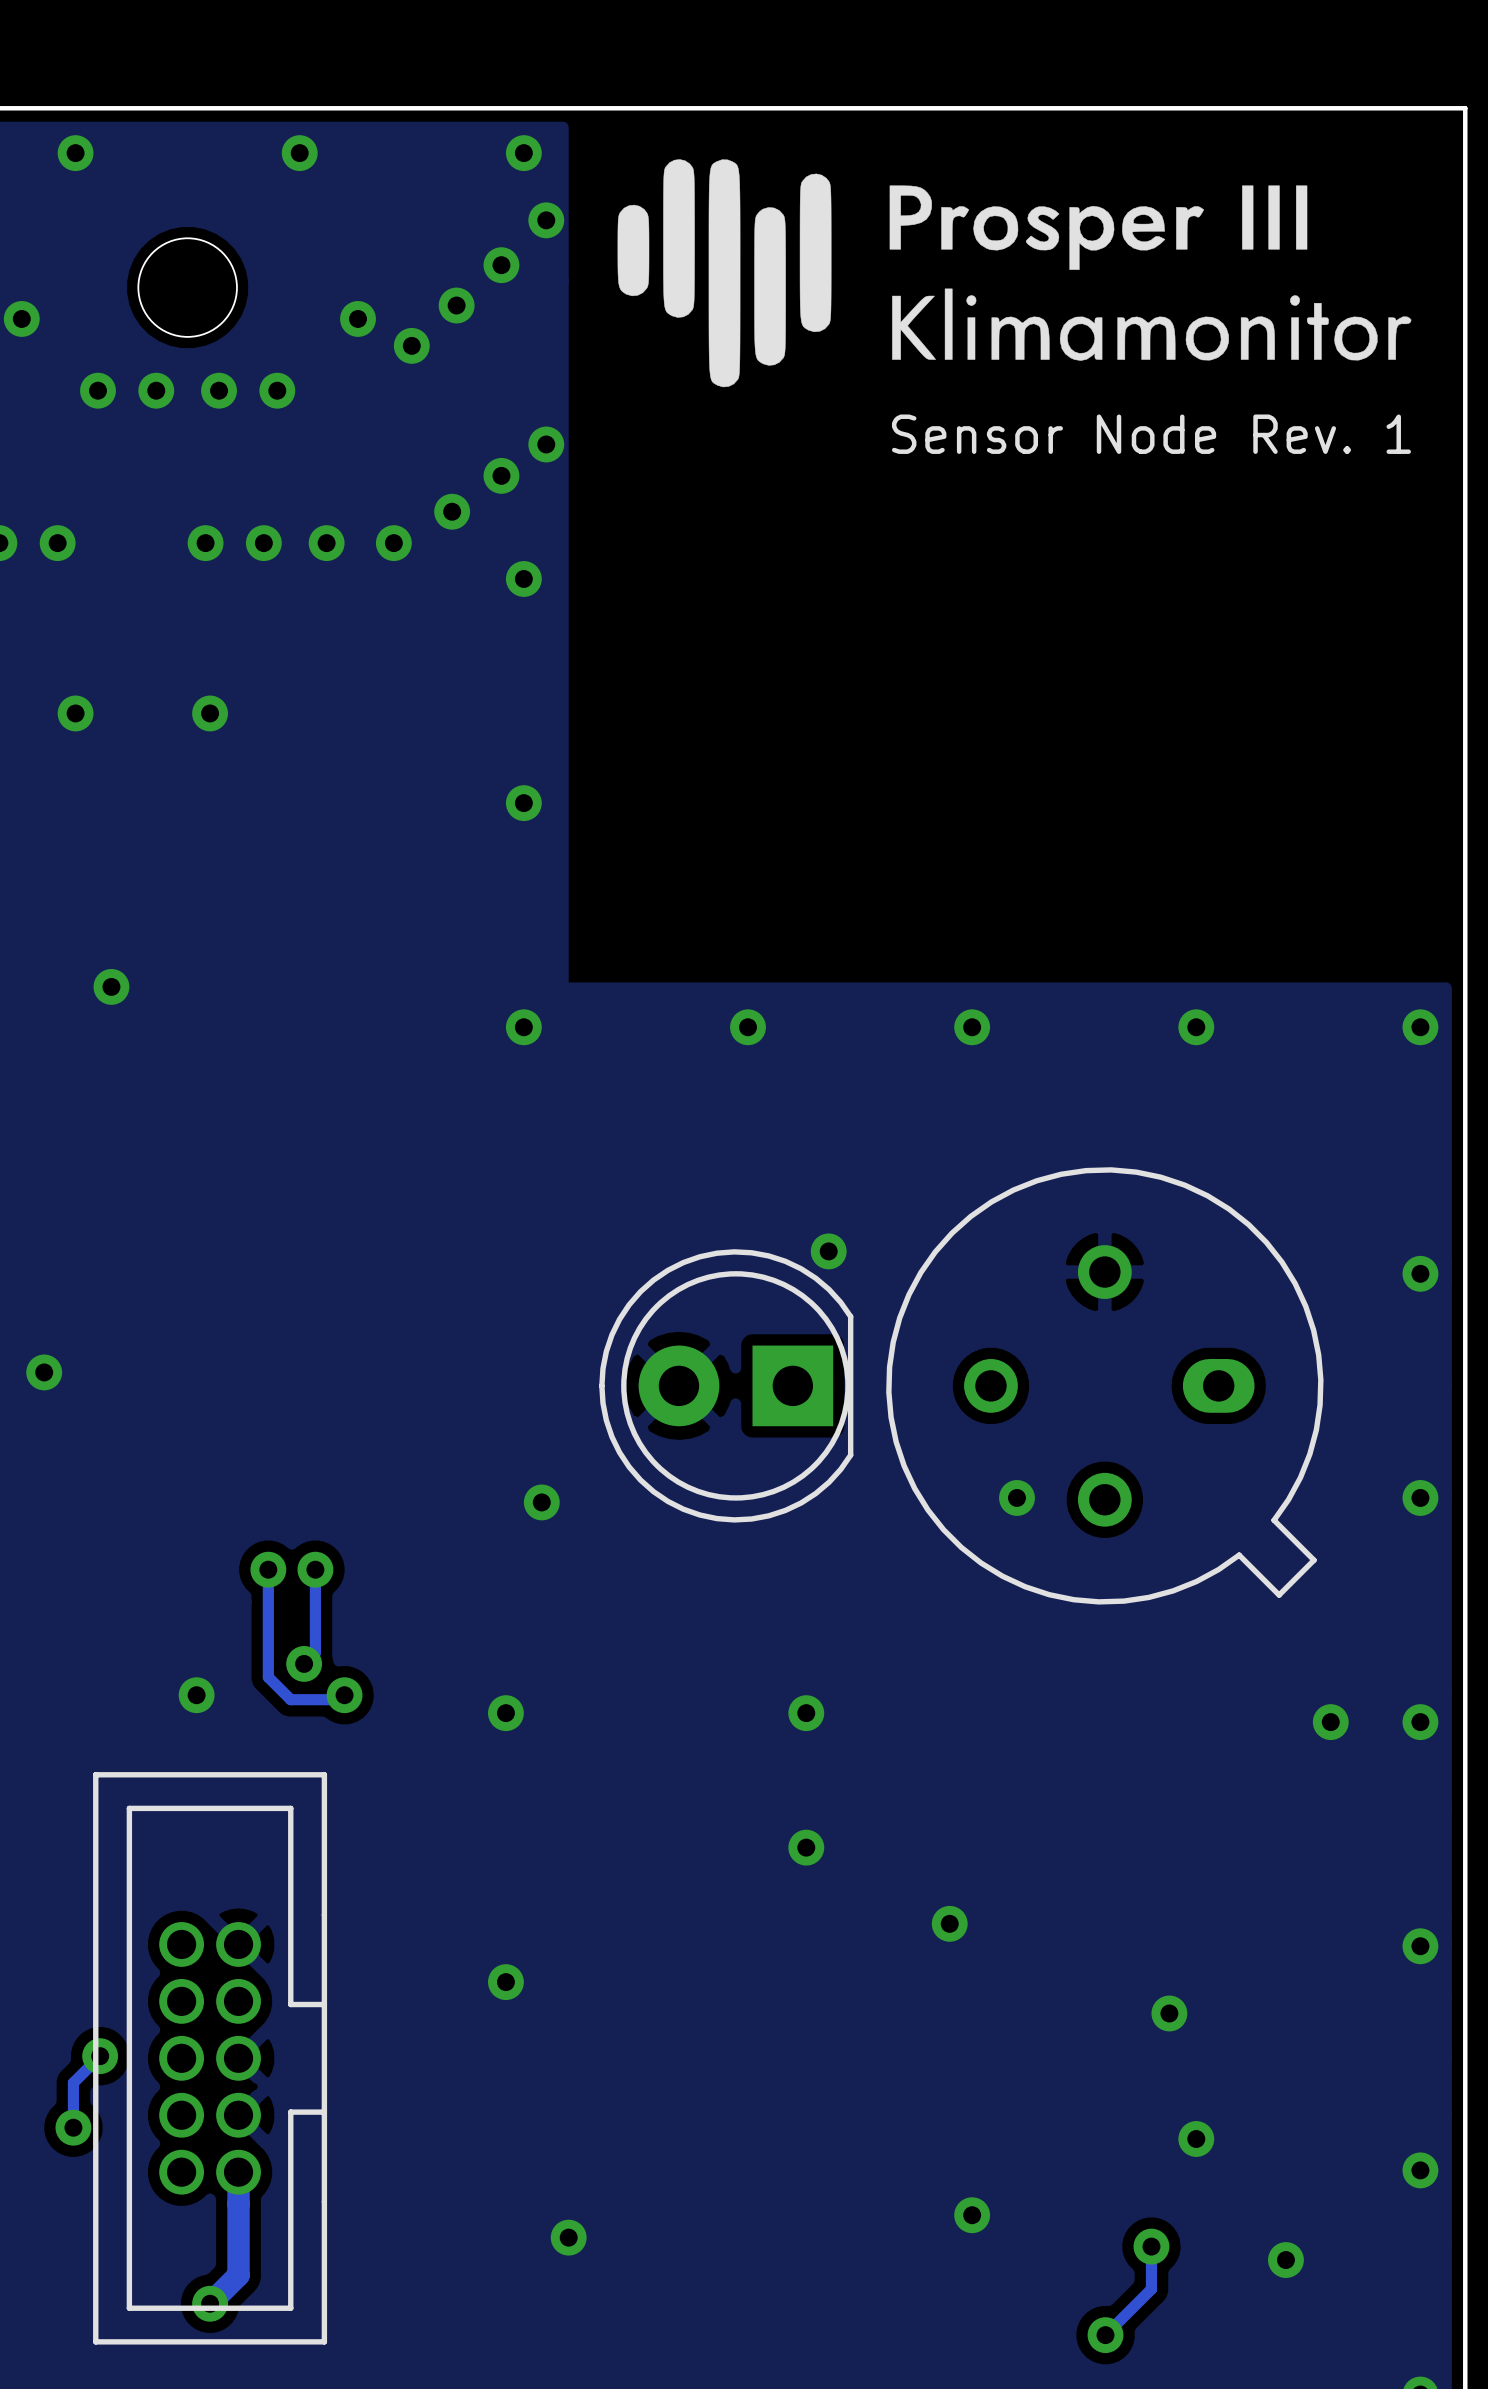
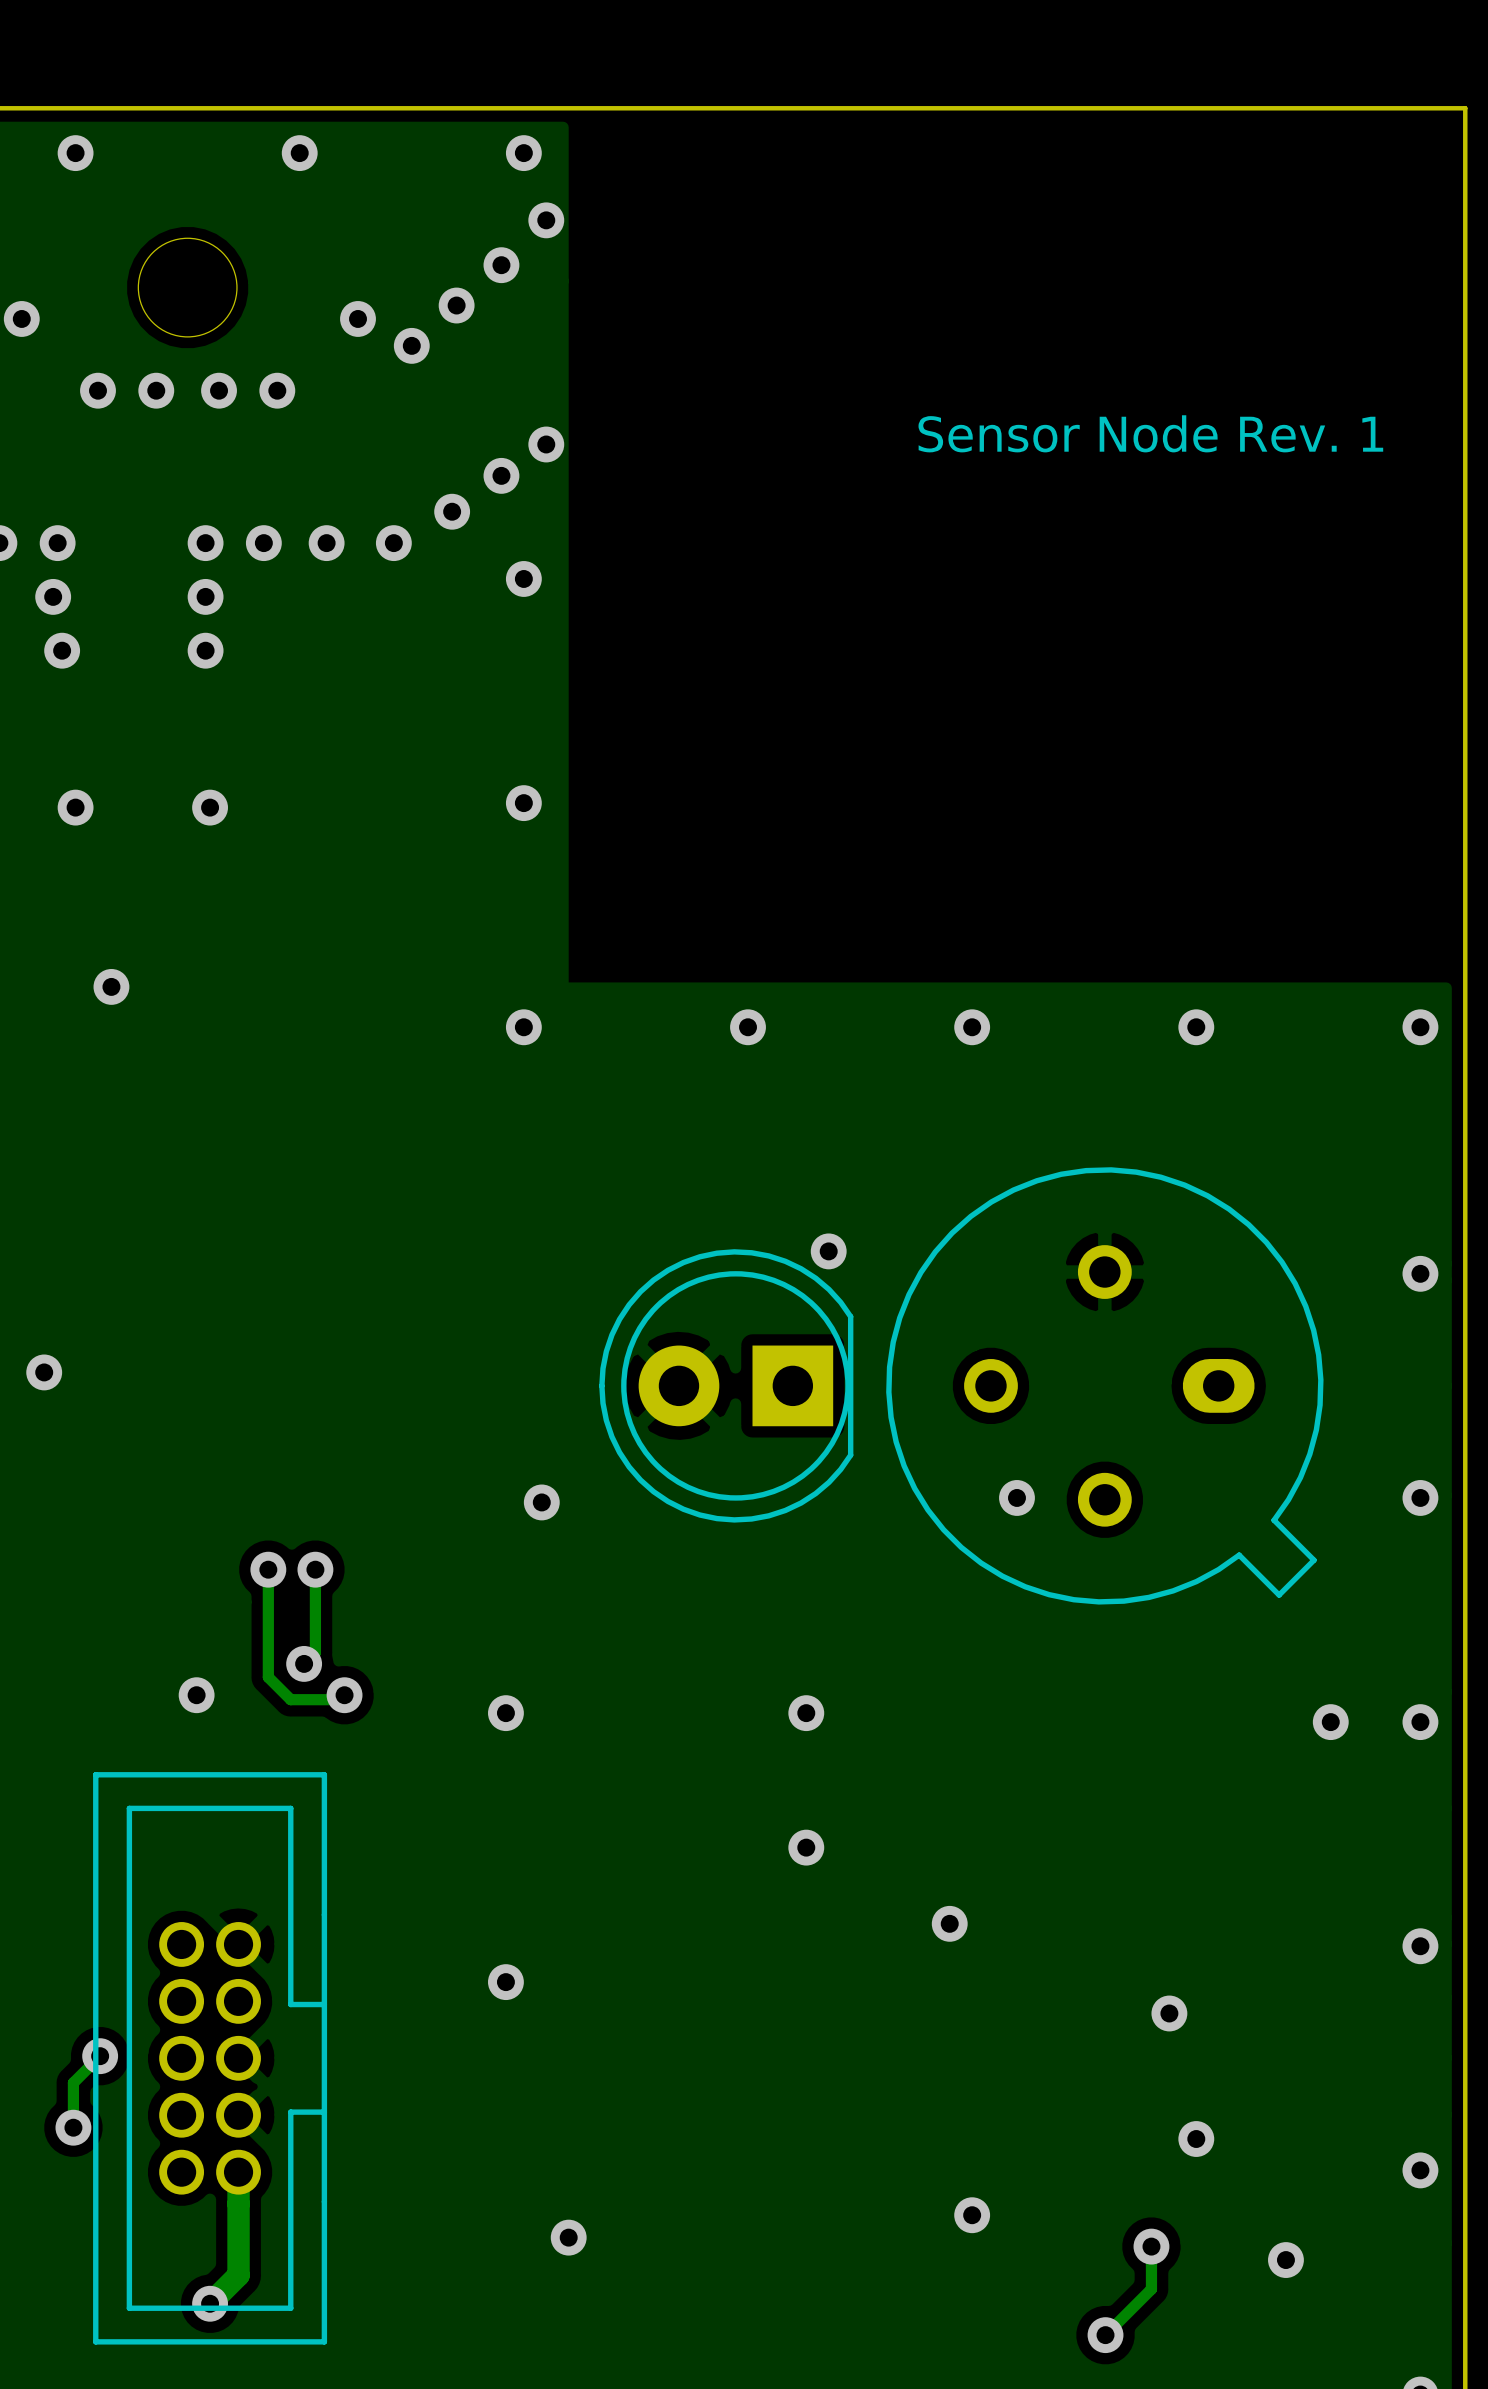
drawing: [617, 159, 1412, 388] -> none
via: none -> (53, 596)
via: none -> (205, 596)
via: none -> (62, 650)
via: none -> (205, 650)
via: (75, 713) -> none
via: (210, 713) -> none
via: none -> (75, 807)
via: none -> (210, 807)

